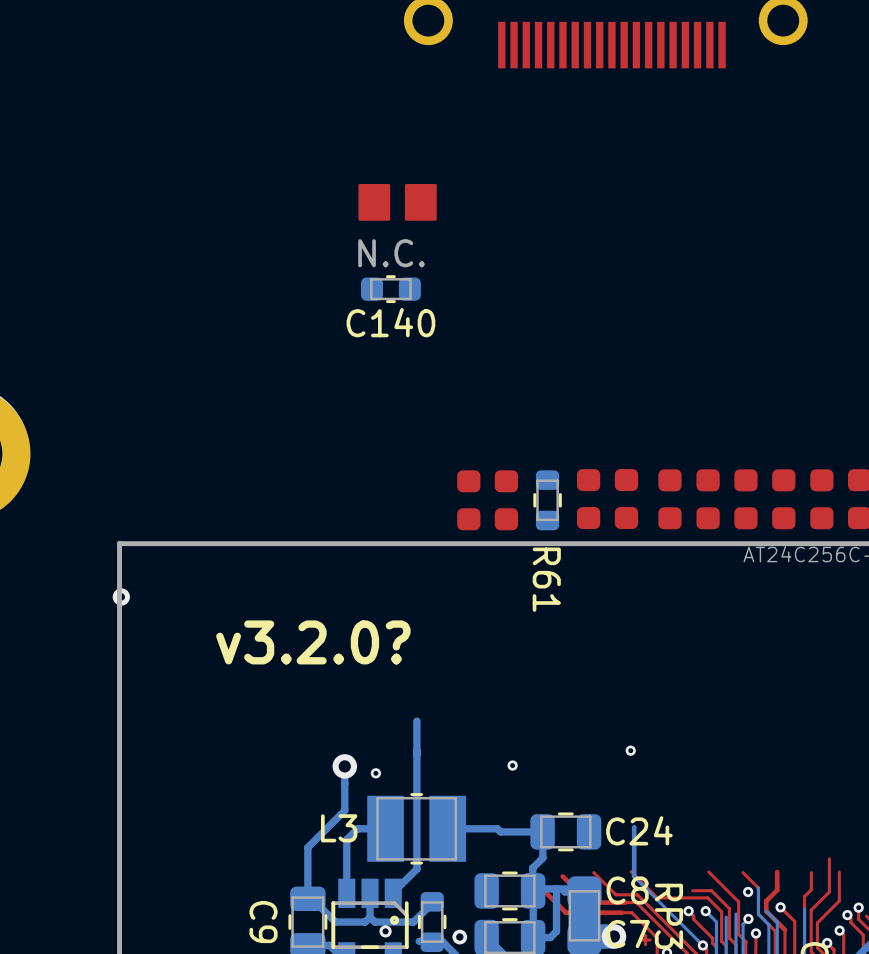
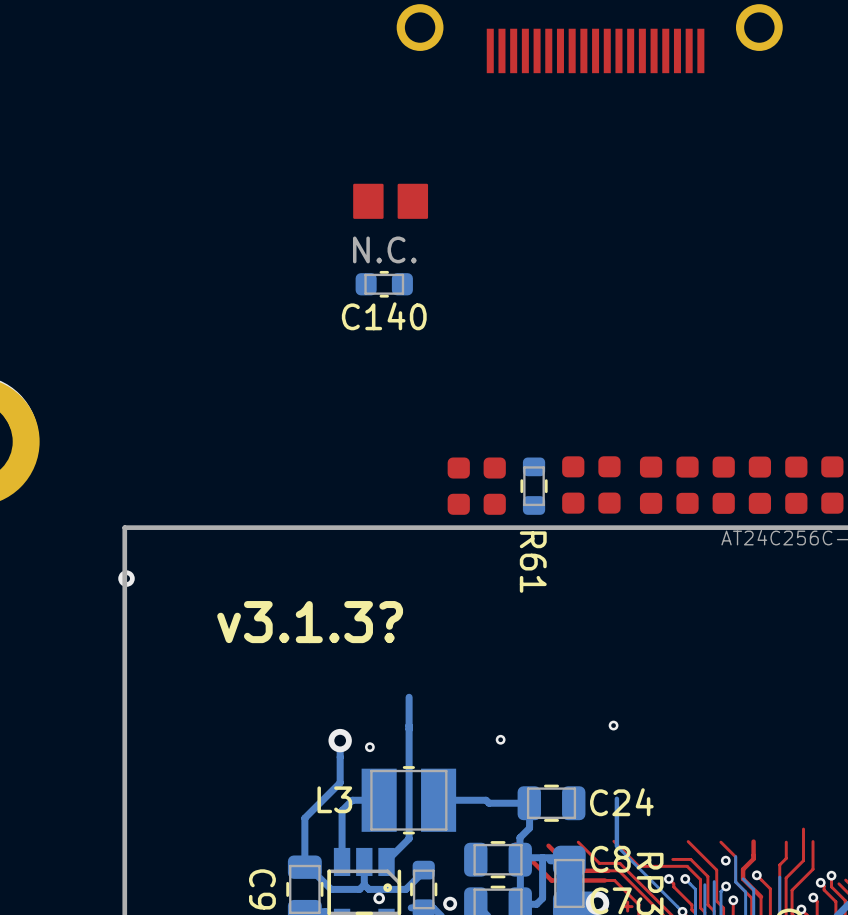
text: v3.2.0? (313, 642) -> v3.1.3? (310, 622)

